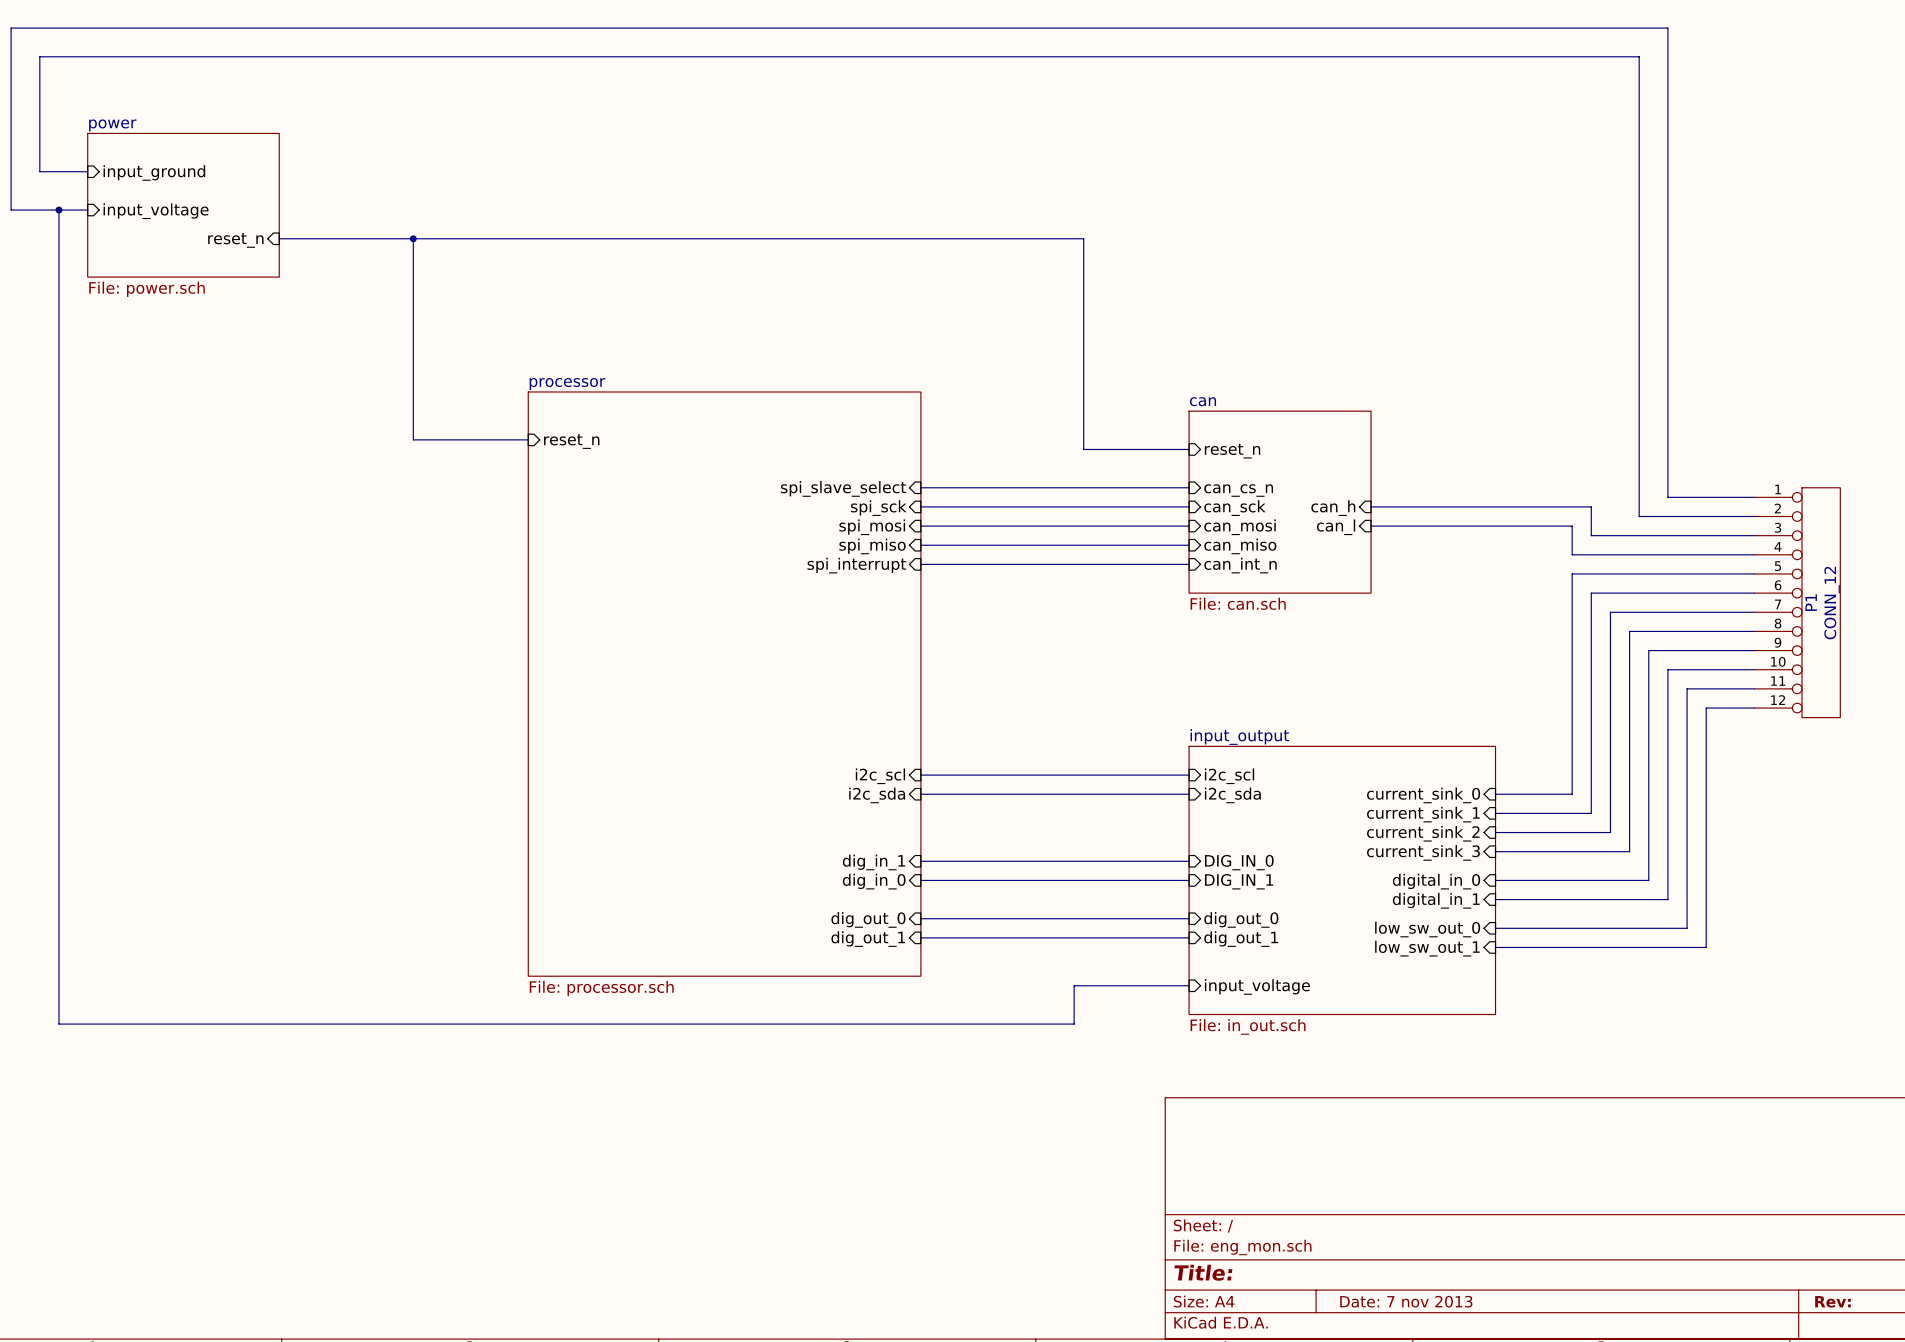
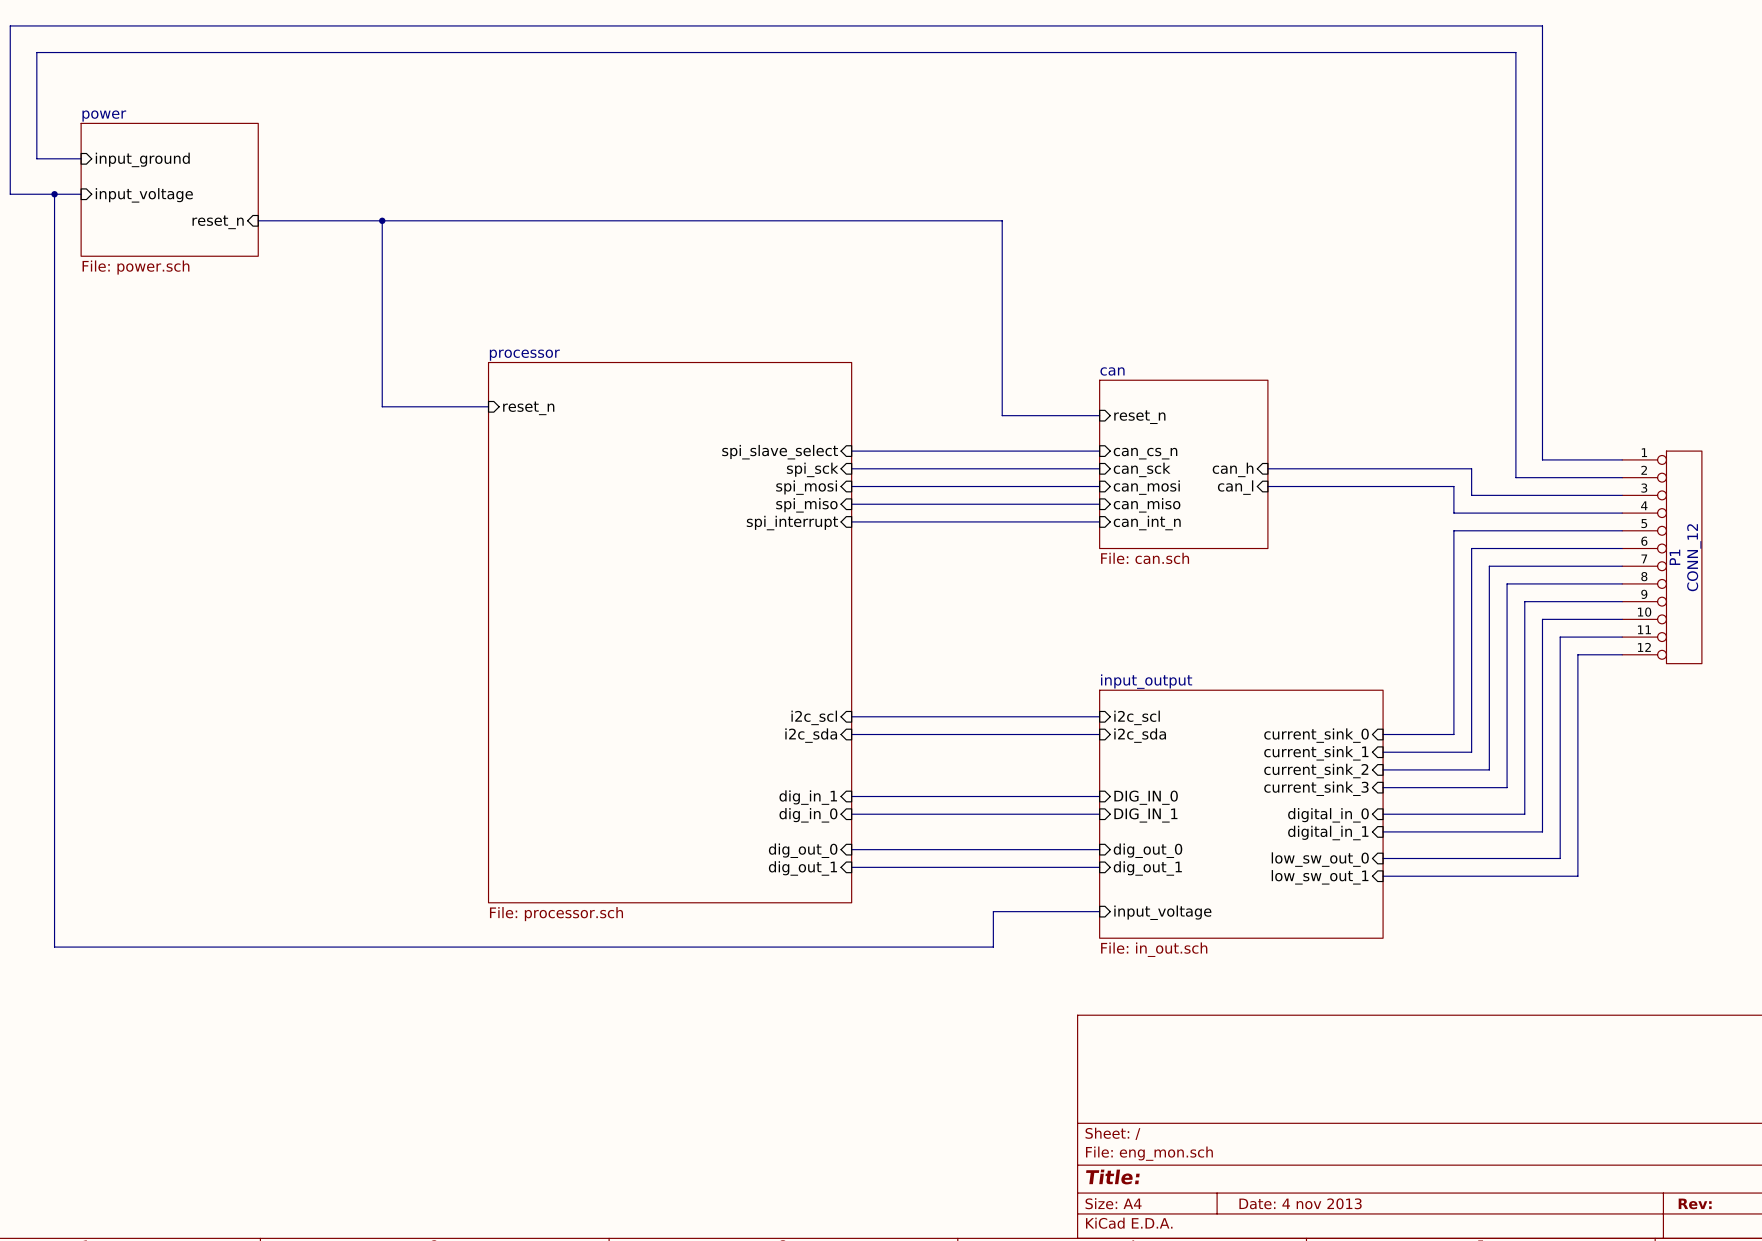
title block: Date: 7 nov 2013 (1406, 1301) -> Date: 4 nov 2013 (1300, 1203)

